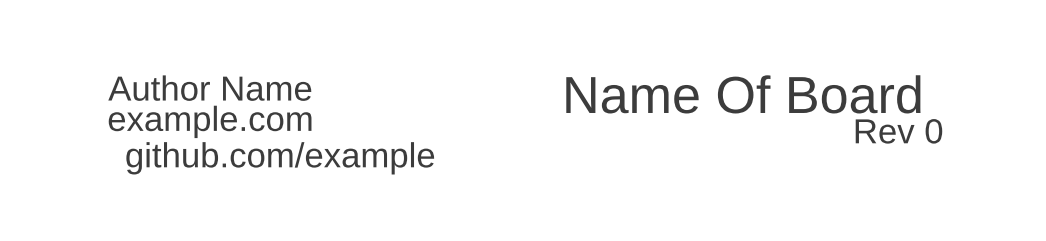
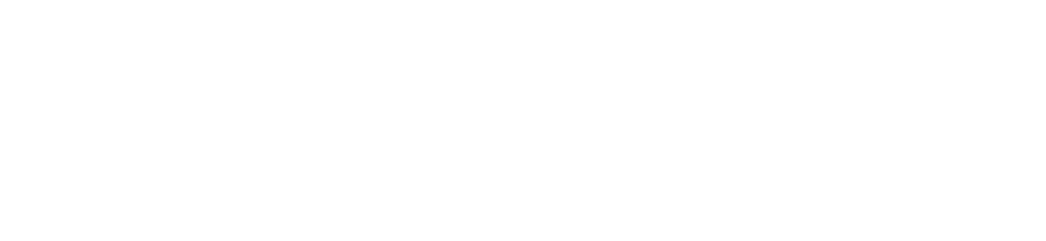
drawing: [108, 75, 943, 175] -> none

